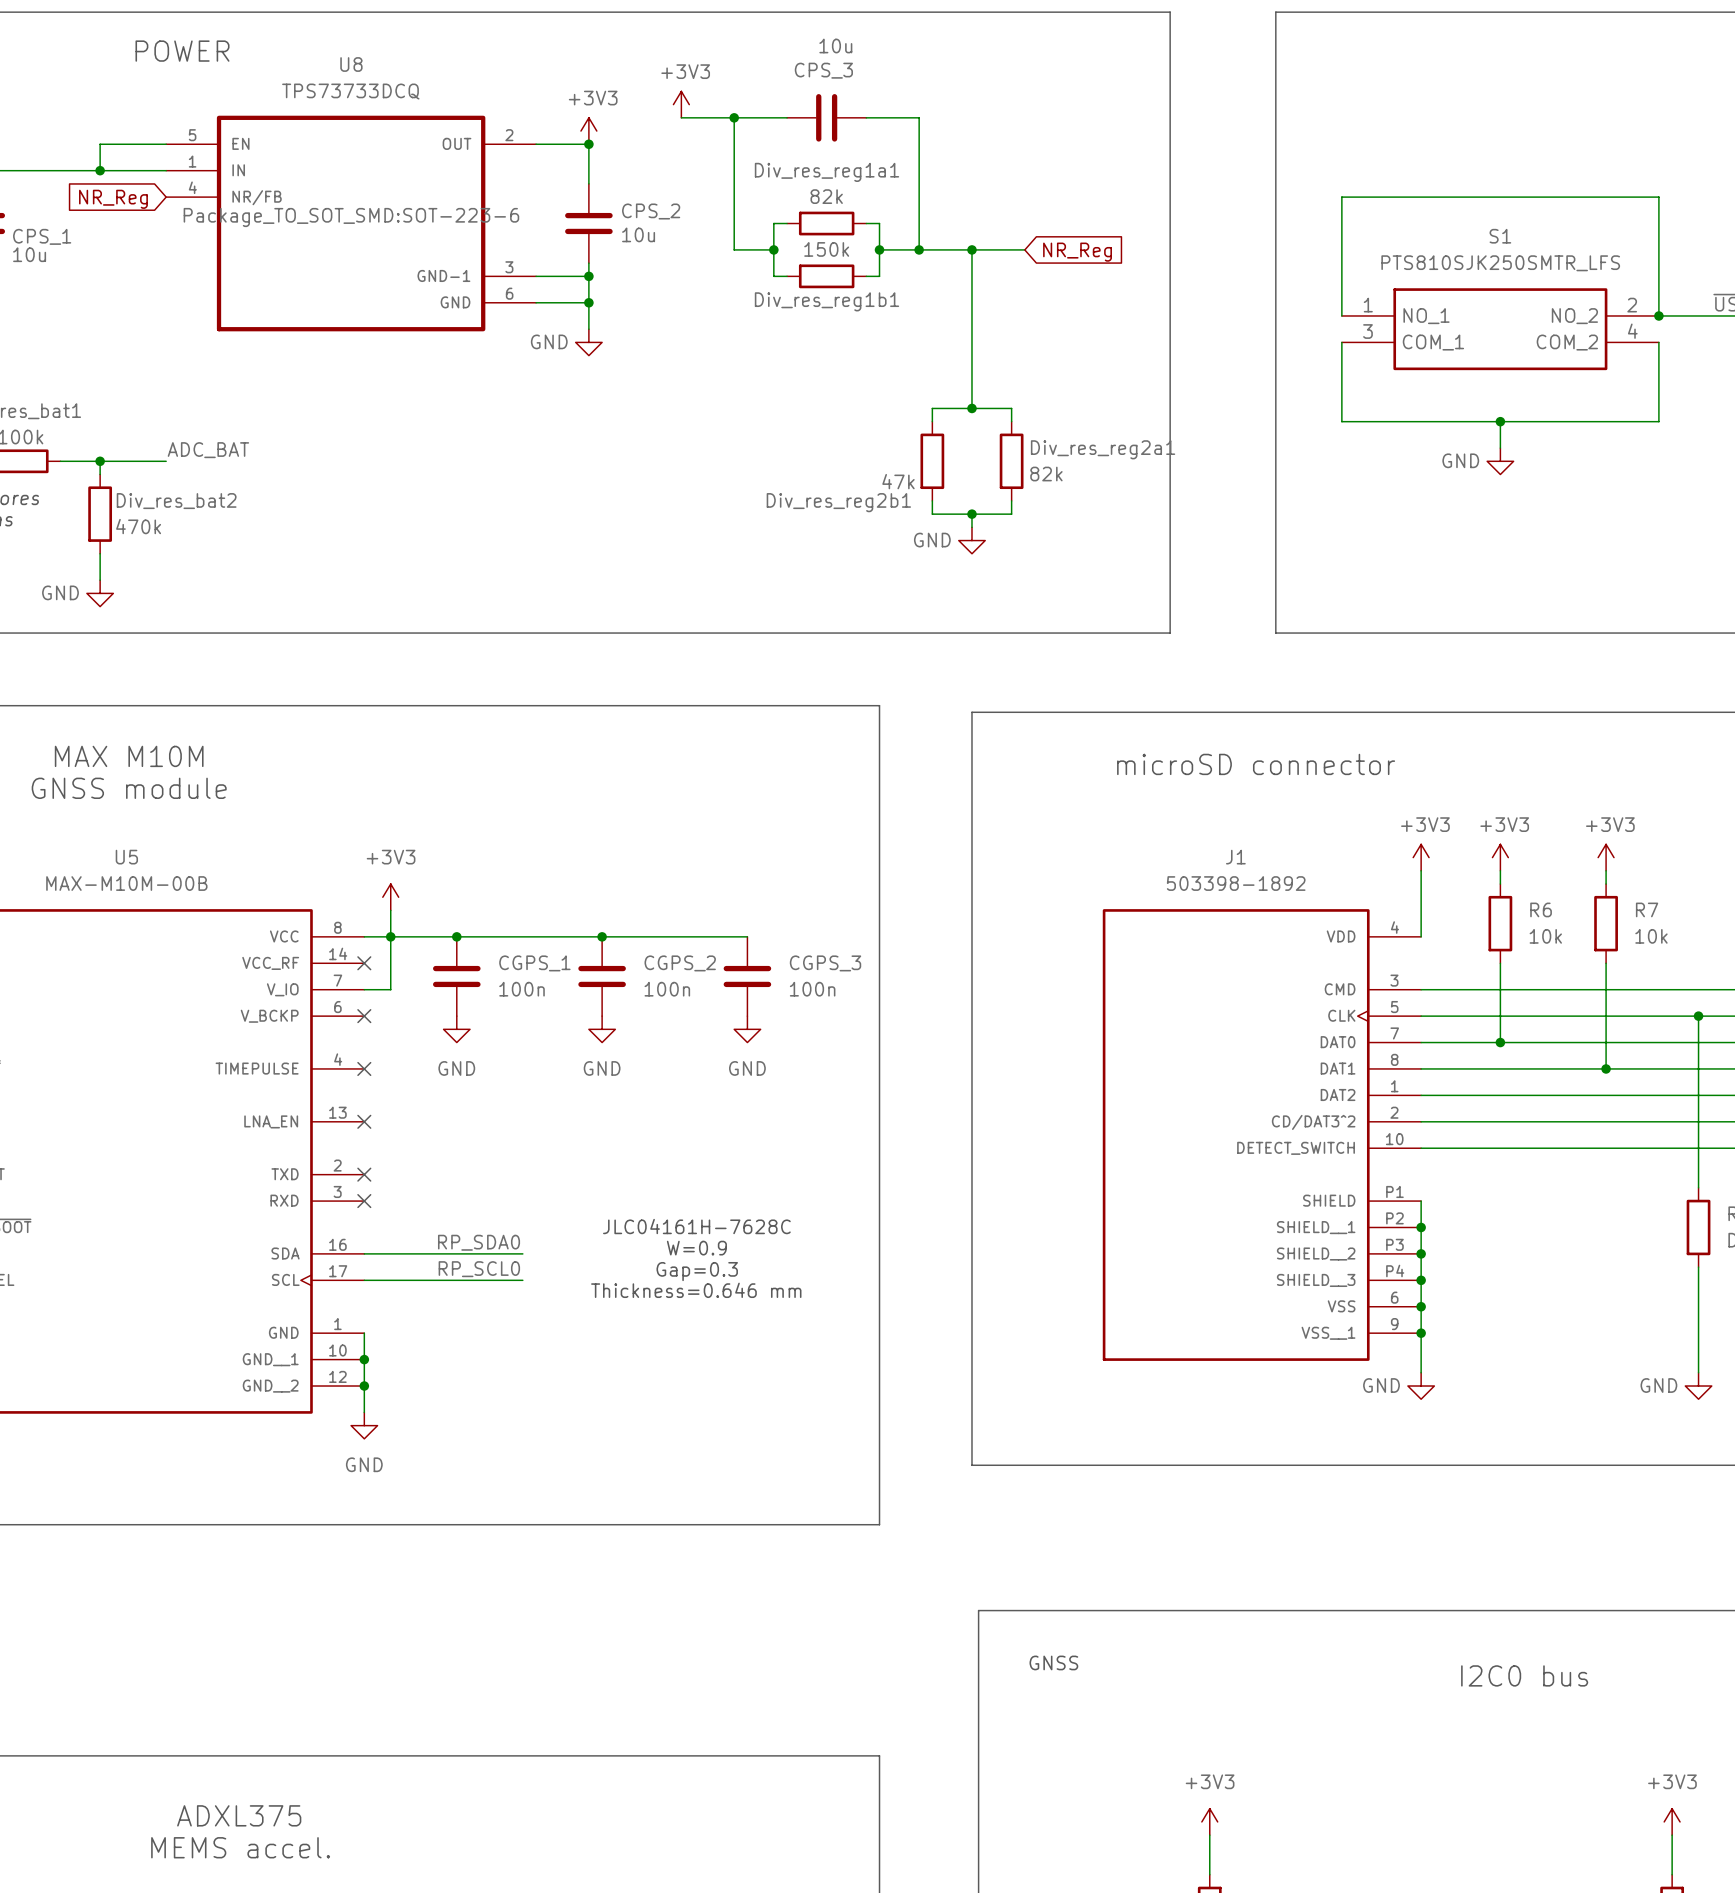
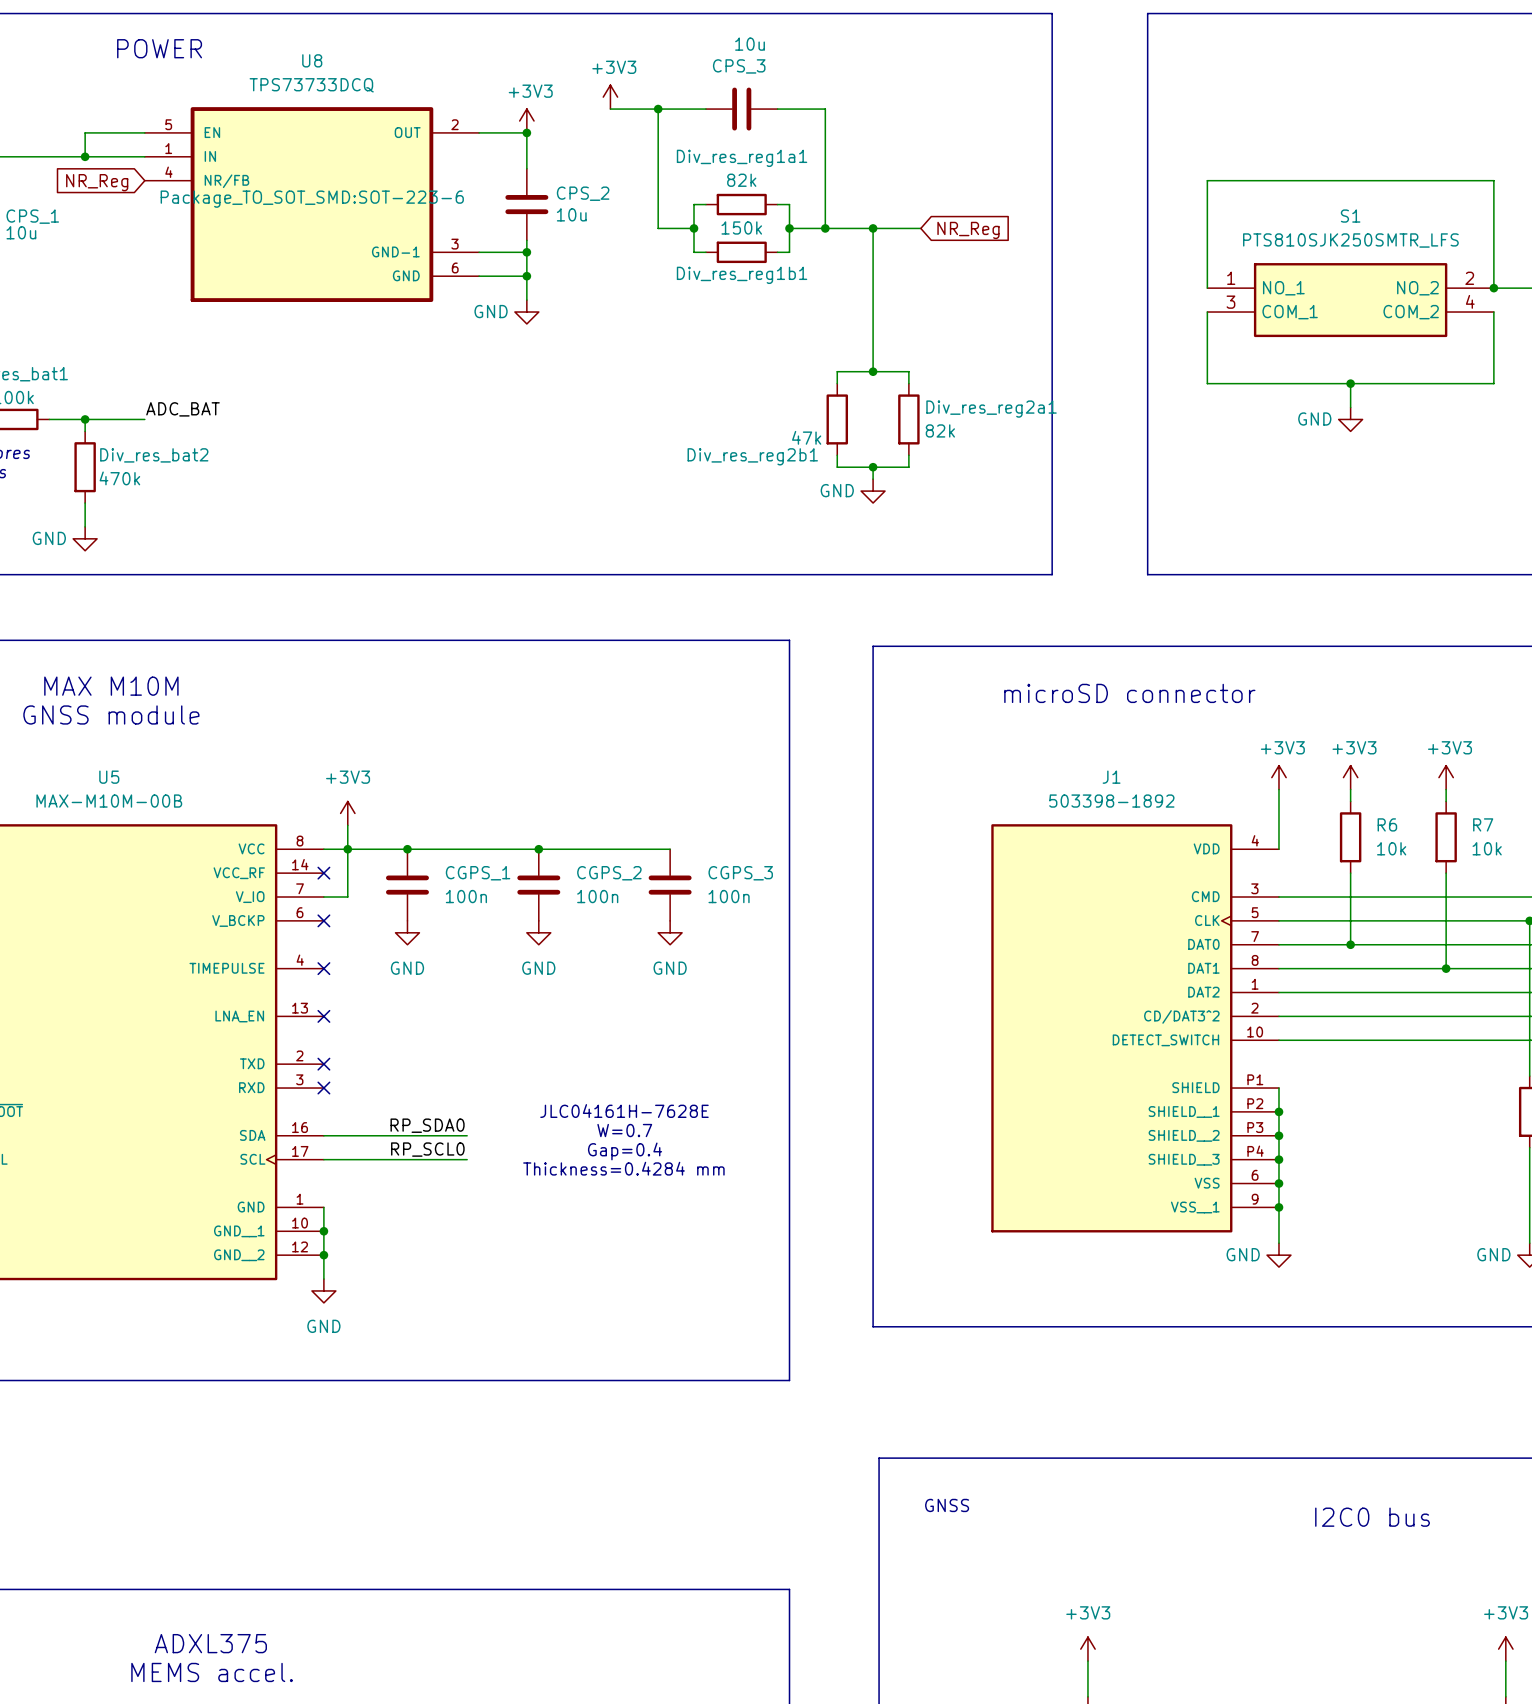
text: JLC04161H-7628C (696, 1226) -> JLC04161H-7628E (624, 1111)
text: W=0.9 (696, 1248) -> W=0.7 (624, 1130)
text: Gap=0.3 (697, 1271) -> Gap=0.4 (625, 1151)
text: Thickness=0.646 mm (696, 1290) -> Thickness=0.4284 mm (623, 1168)

